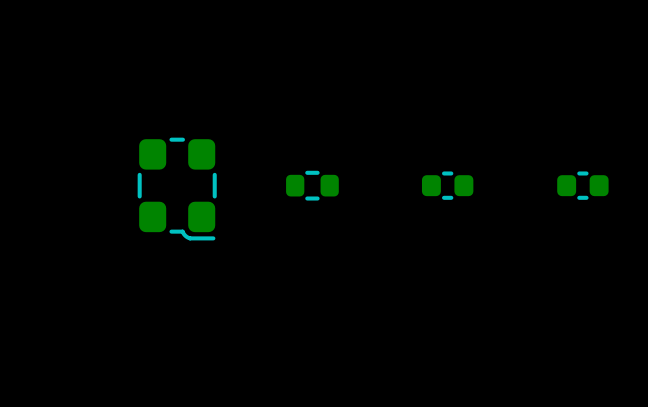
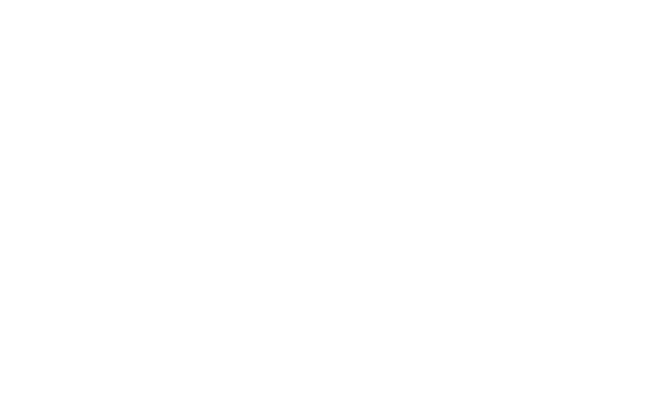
part: (312, 185) -> none
part: (447, 185) -> none
part: (582, 185) -> none
part: (177, 189) -> none

